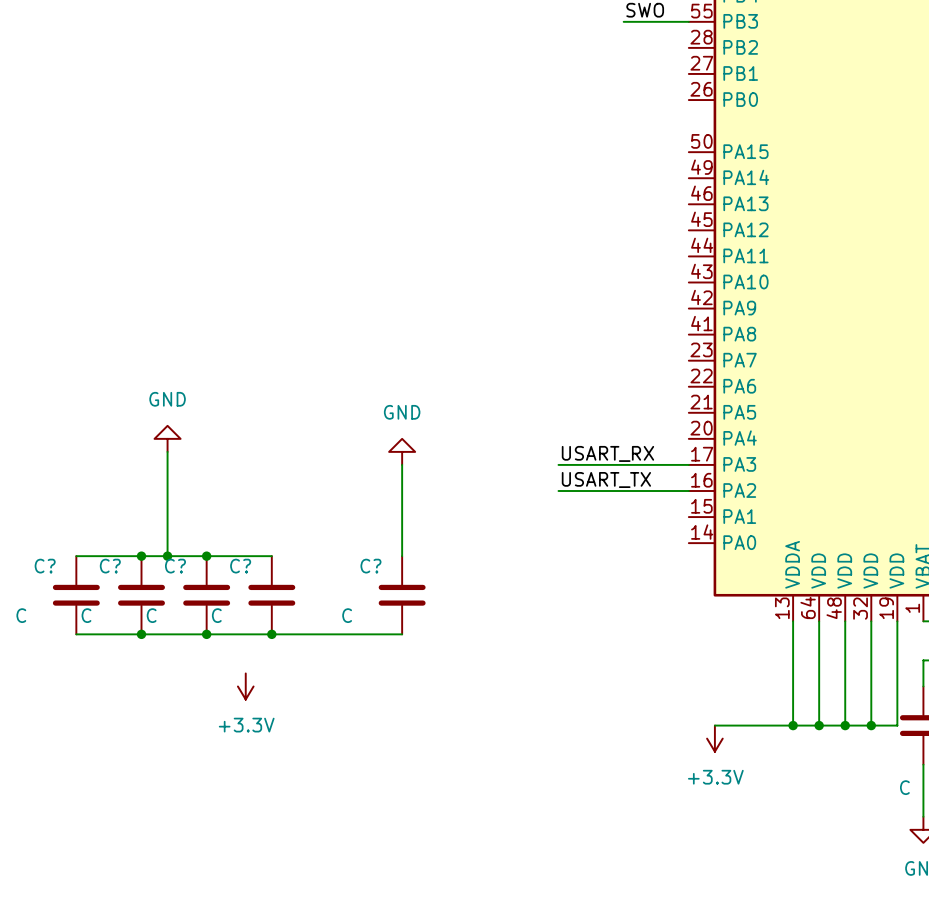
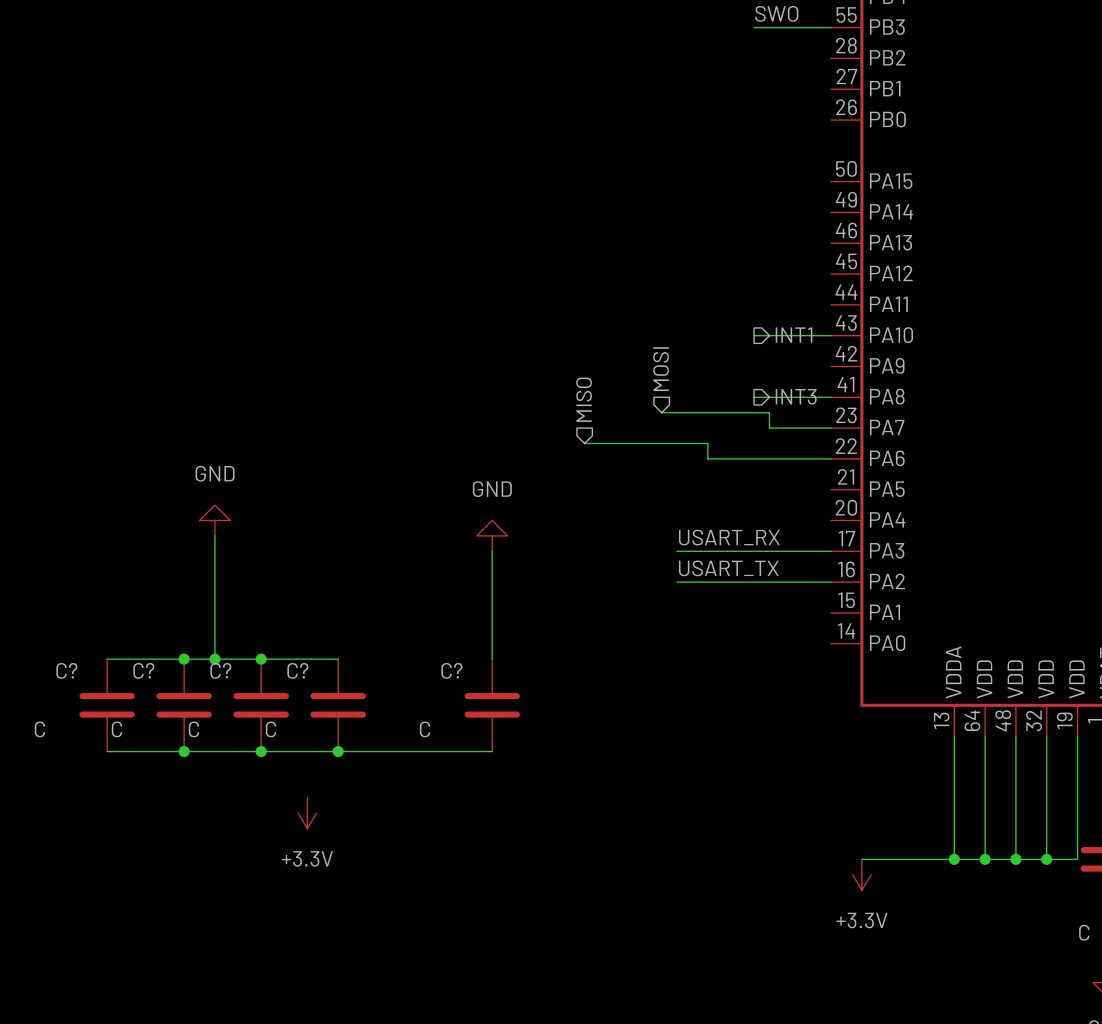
wire: none -> (754, 335) (831, 335)
hierarchical label: none -> INT1 (794, 335)
hierarchical label: none -> MOSI (661, 369)
hierarchical label: none -> MISO (584, 399)
wire: none -> (754, 397) (831, 397)
hierarchical label: none -> INT3 (796, 396)
wire: none -> (661, 412) (769, 412) (769, 428) (831, 428)
wire: none -> (584, 443) (707, 443) (707, 458) (831, 458)

